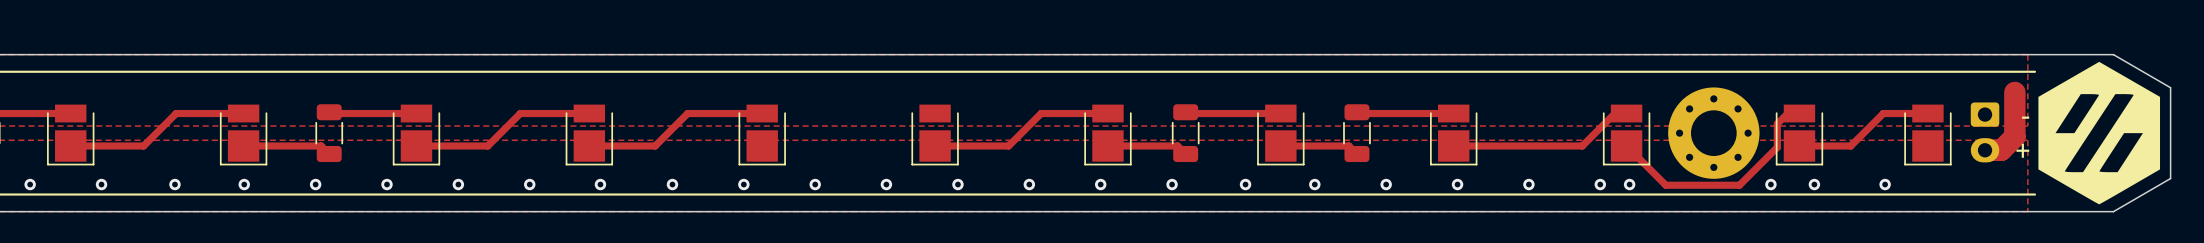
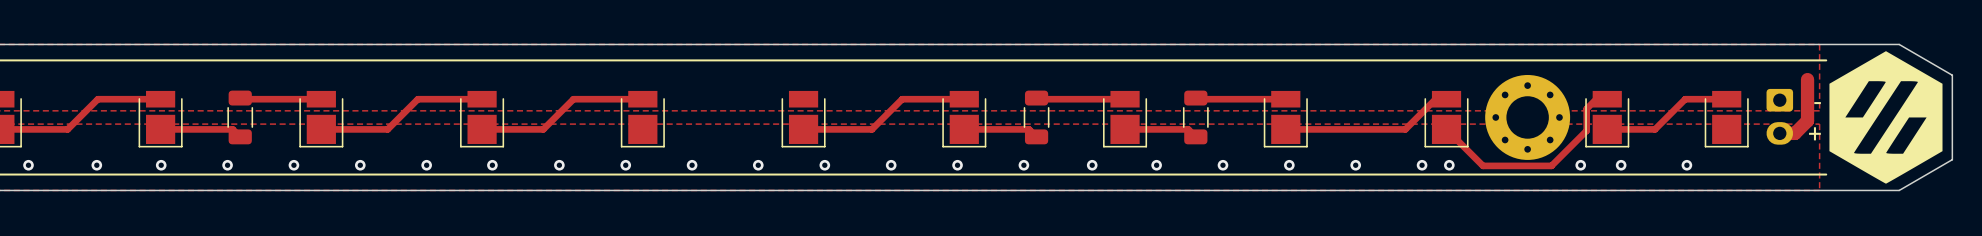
track width: thick (2014, 92) (2014, 136) (2001, 150) (1985, 150) -> thin (1807, 79) (1807, 120) (1794, 133) (1779, 133)

